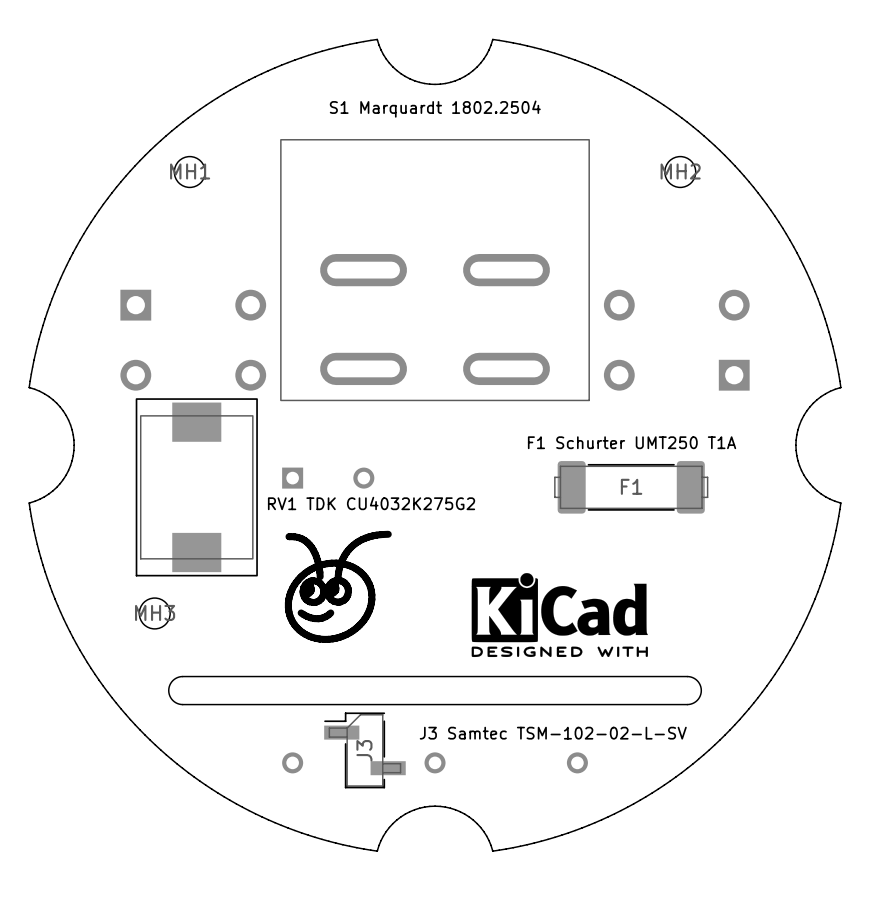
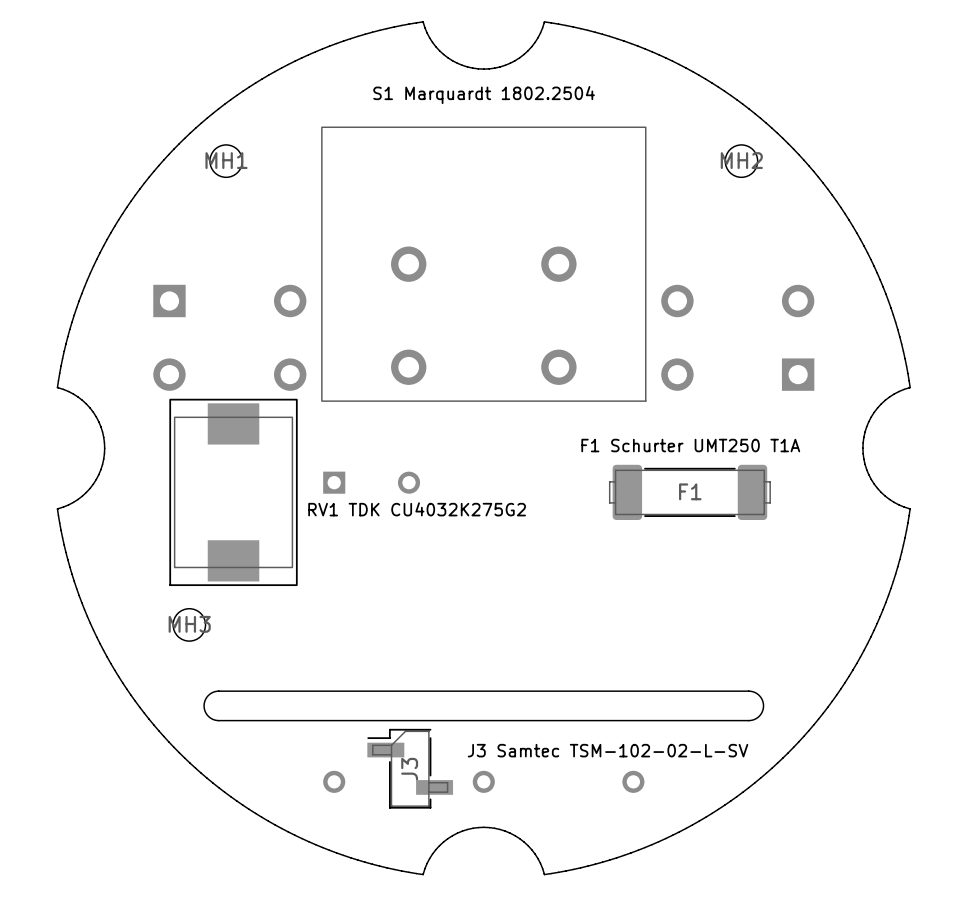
part footprint: [280, 139, 590, 402] -> [321, 126, 647, 402]
drawing: [284, 530, 392, 643] -> none
drawing: [471, 573, 648, 658] -> none

